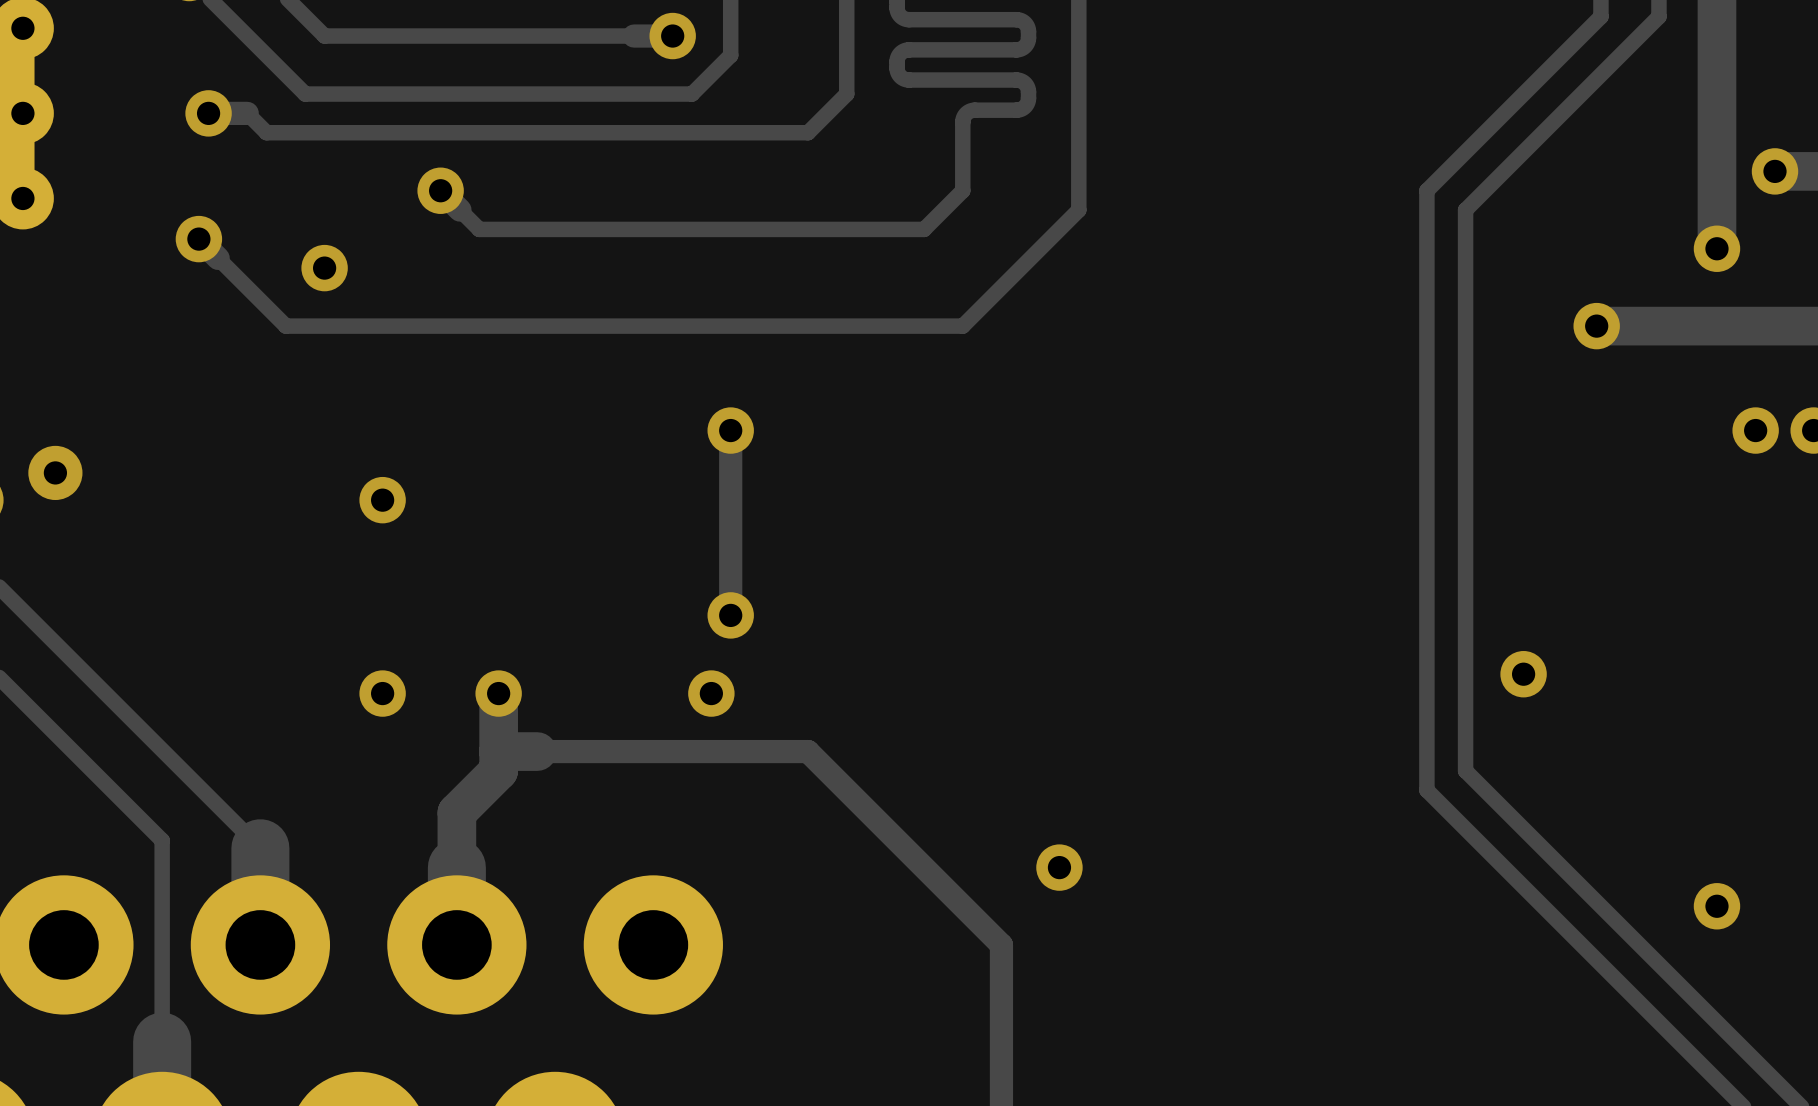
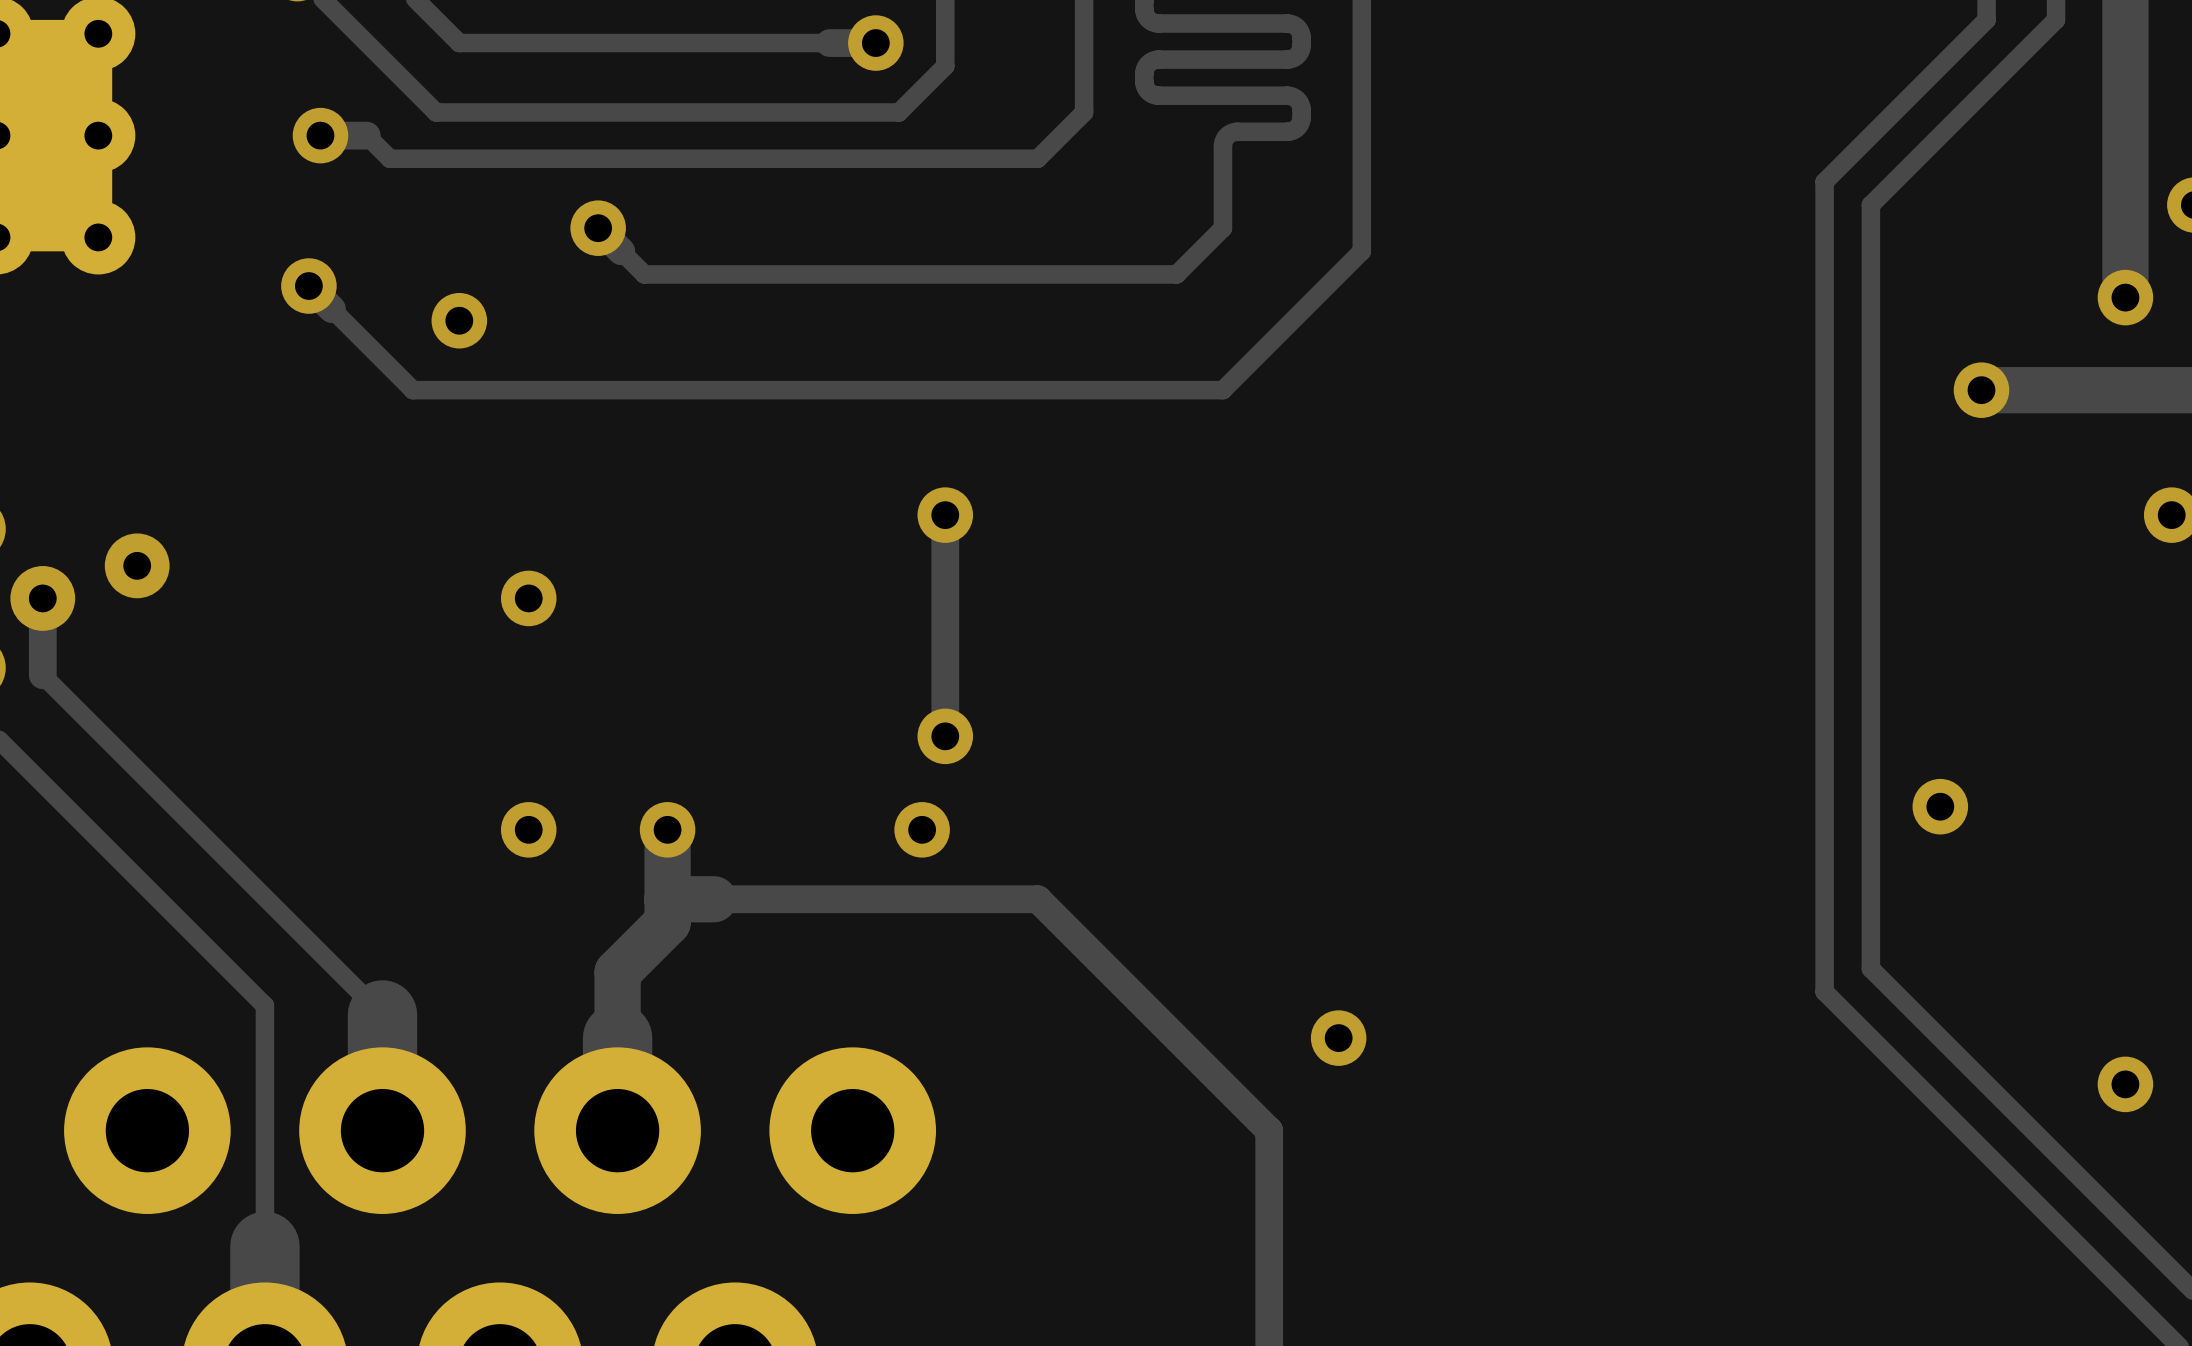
track: (1465, 152) (1426, 190) (1426, 790) (1465, 828) -> none
track: (1504, 171) (1465, 210) -> (1824, 181) (1824, 251)
track: none -> (1870, 205) (1870, 968)
via position: (1523, 674) -> (1940, 806)
track: (1465, 770) (1504, 809) -> (1824, 922) (1824, 991)

